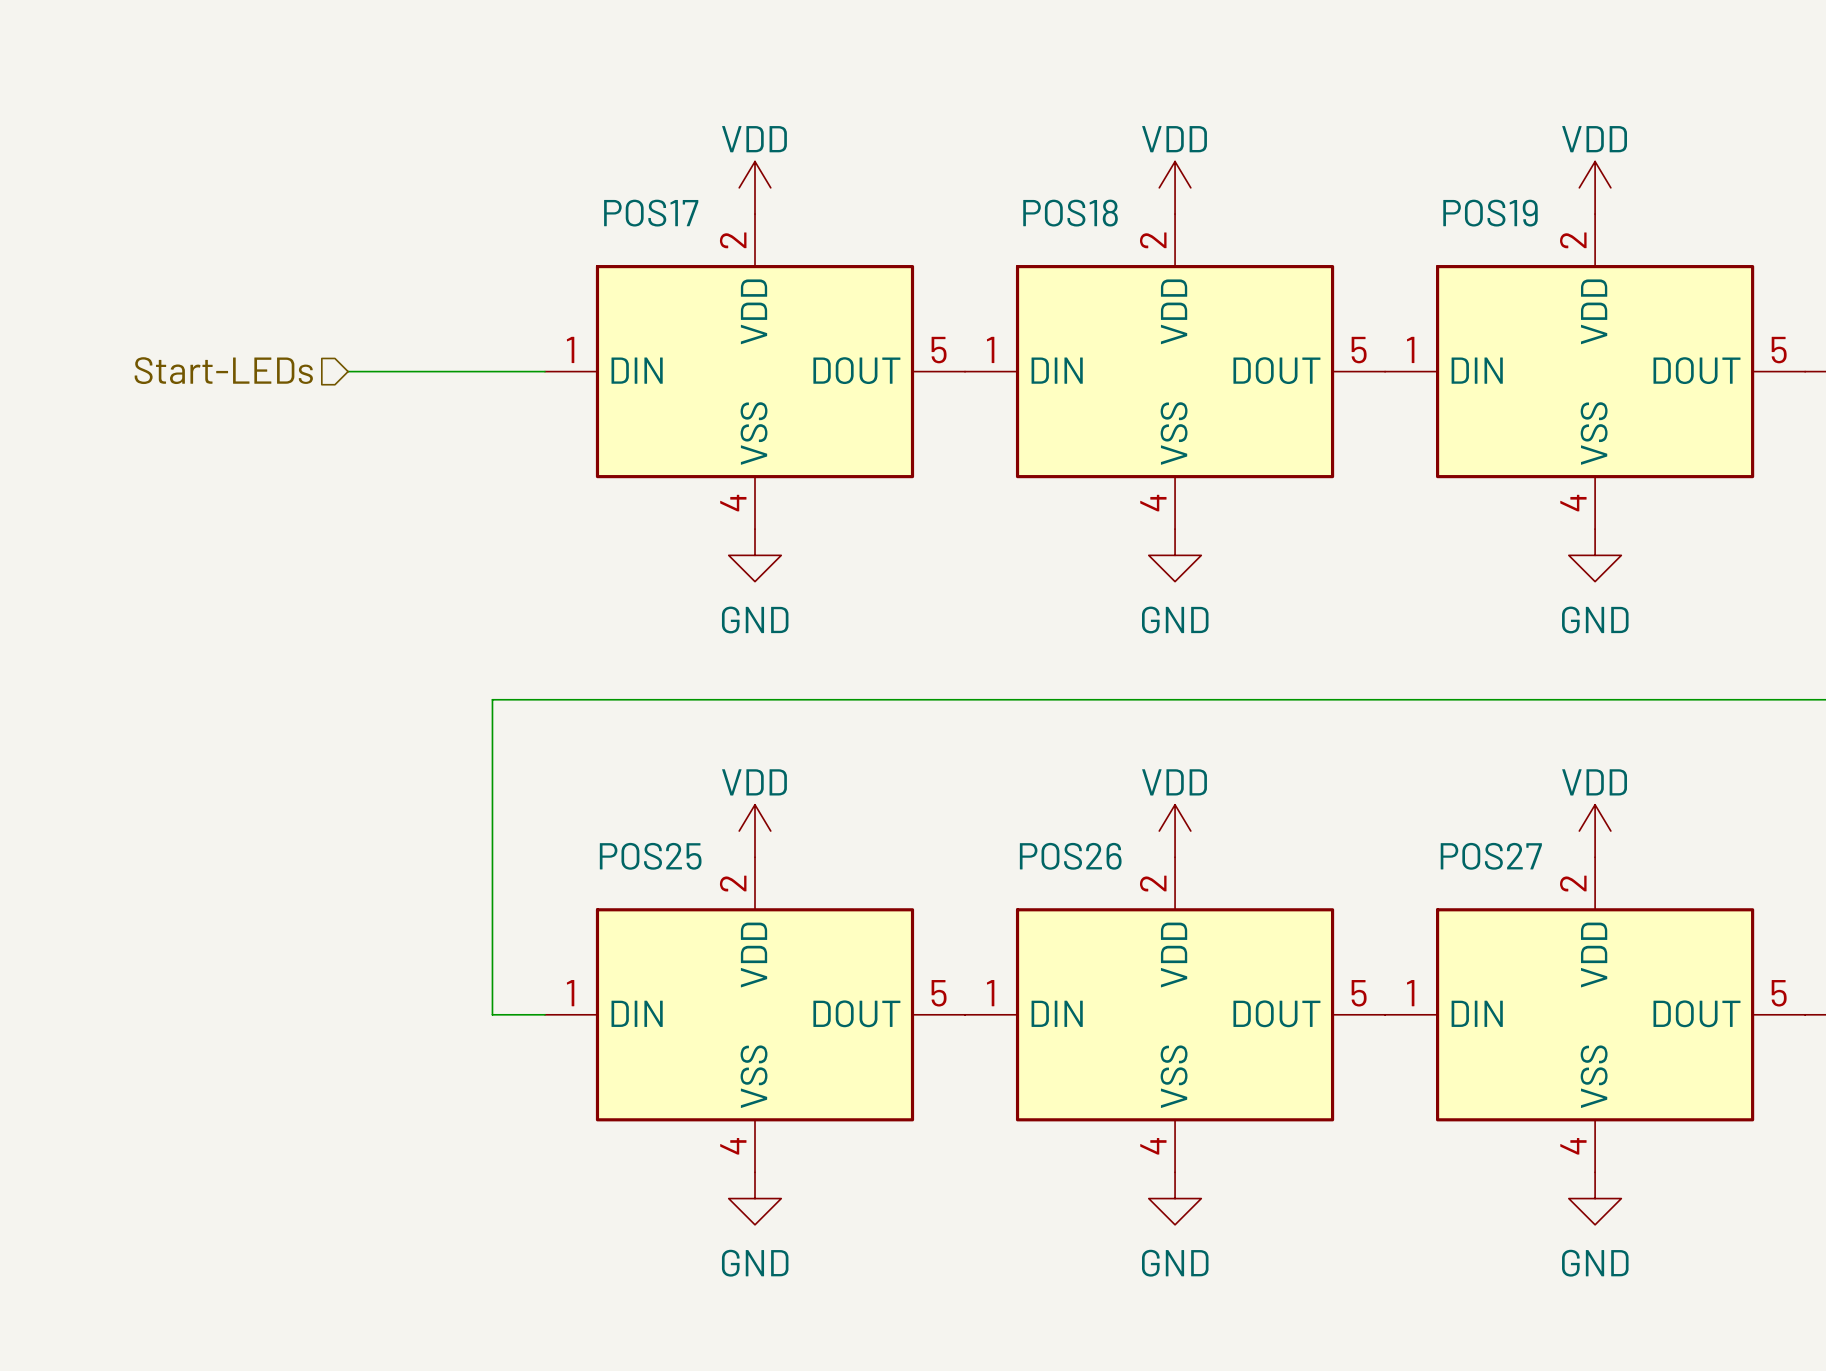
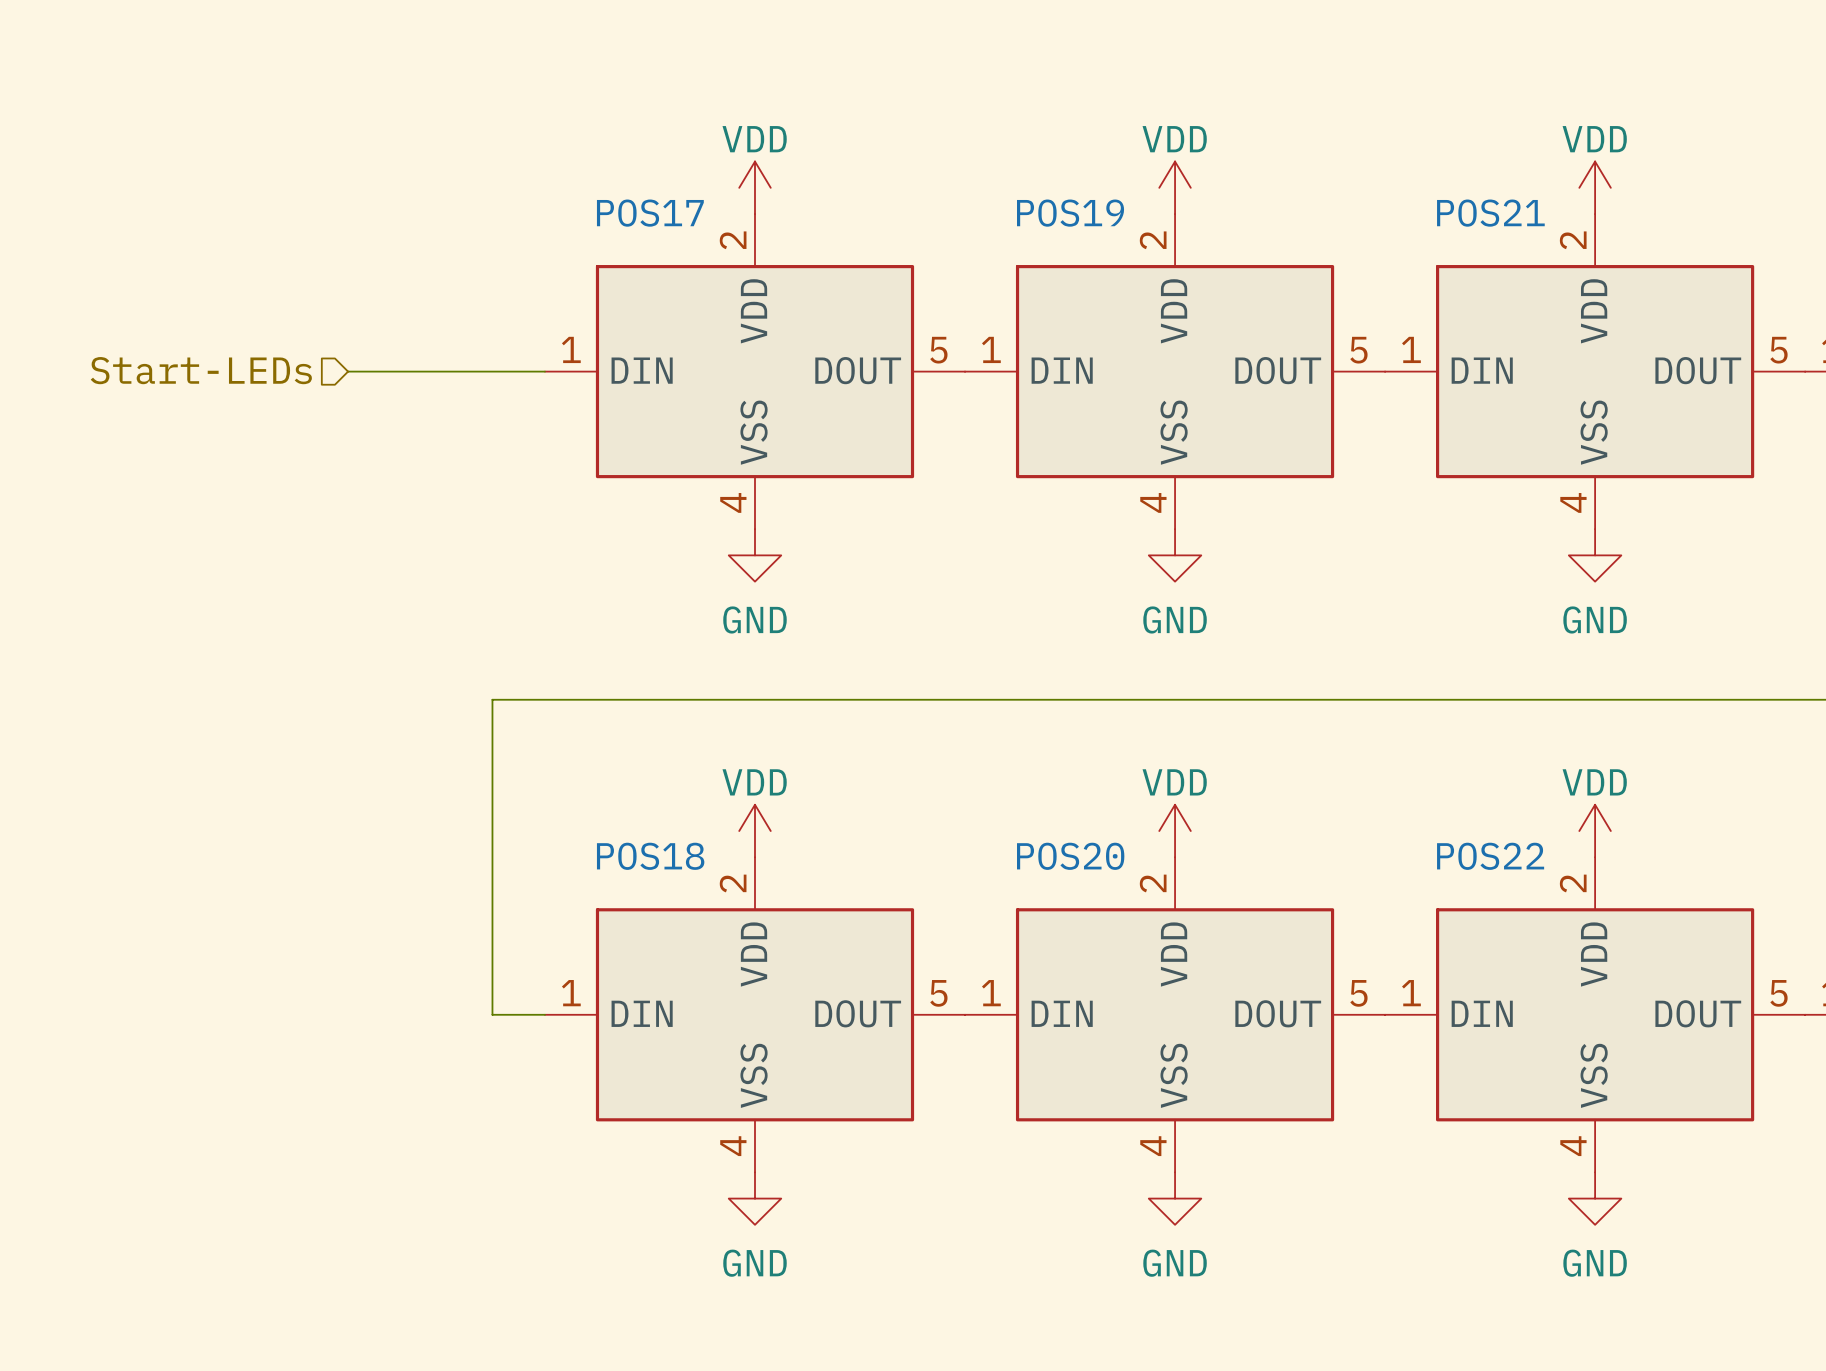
POS18 name: POS18 (1070, 213) -> POS19 (1070, 213)
POS19 name: POS19 (1490, 213) -> POS21 (1490, 213)
POS25 name: POS25 (650, 856) -> POS18 (650, 856)
POS26 name: POS26 (1070, 856) -> POS20 (1070, 856)
POS27 name: POS27 (1491, 856) -> POS22 (1490, 856)

